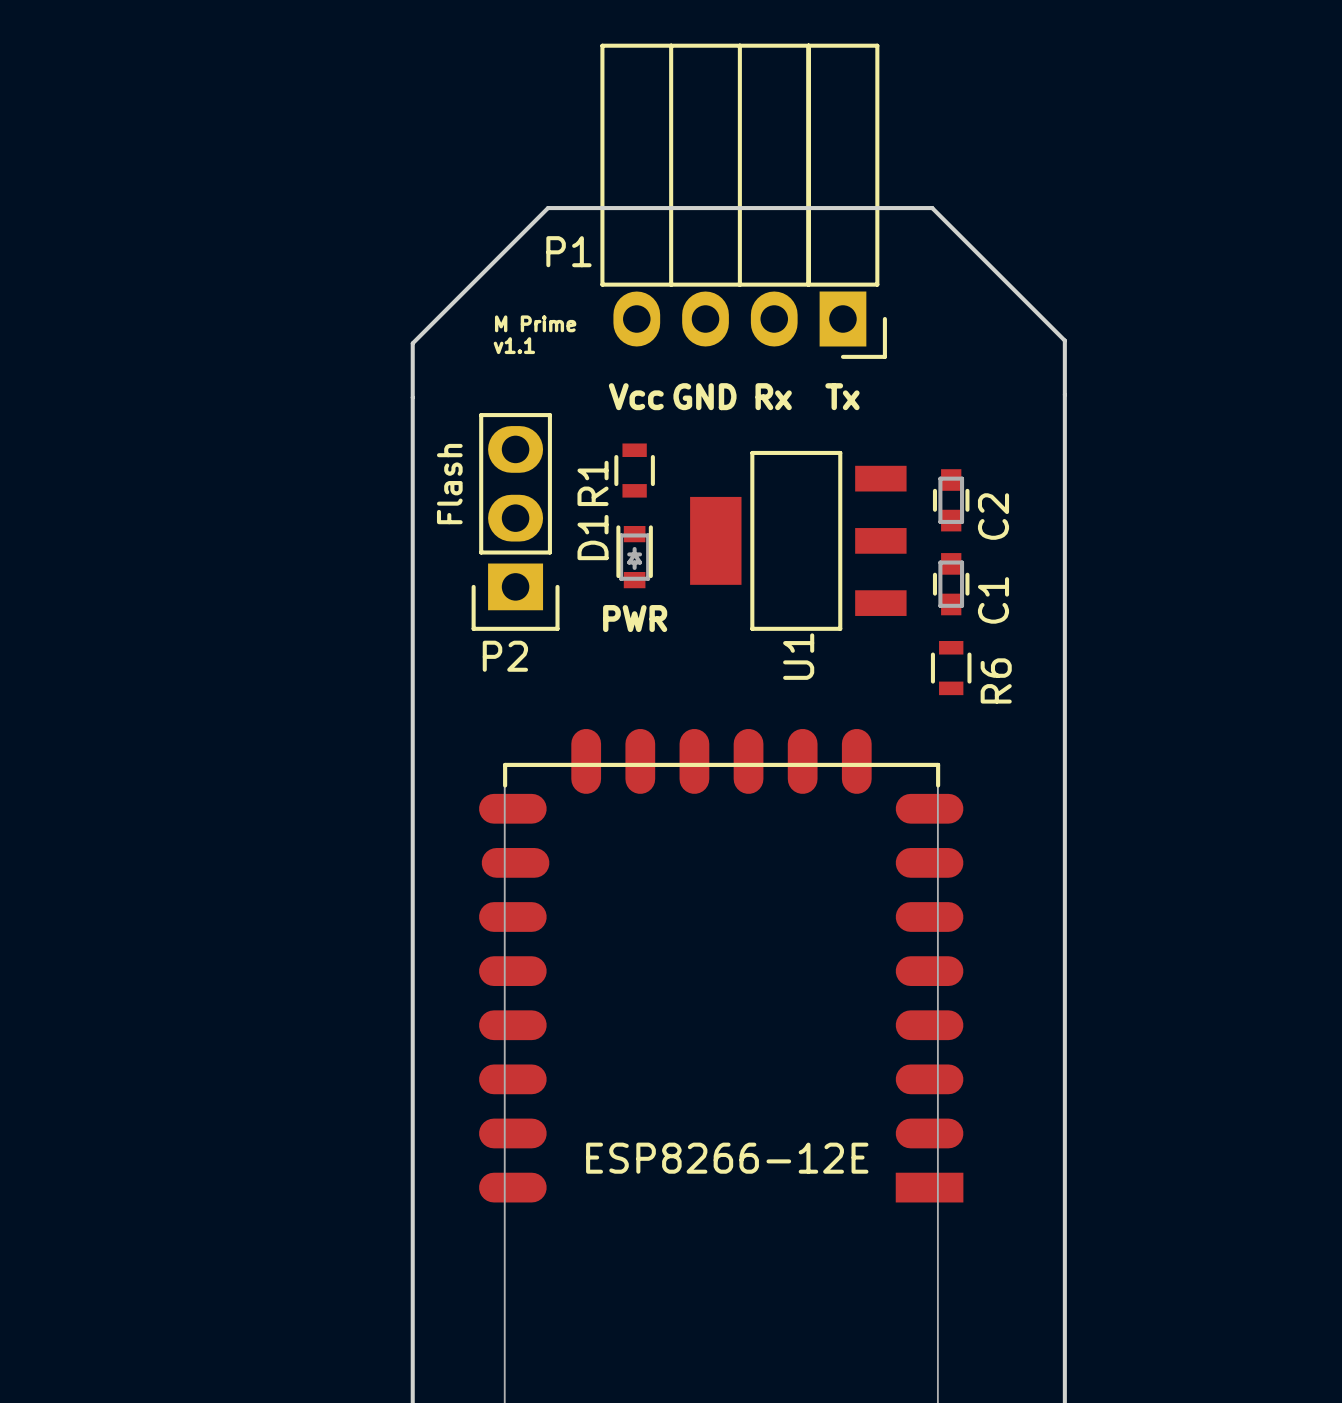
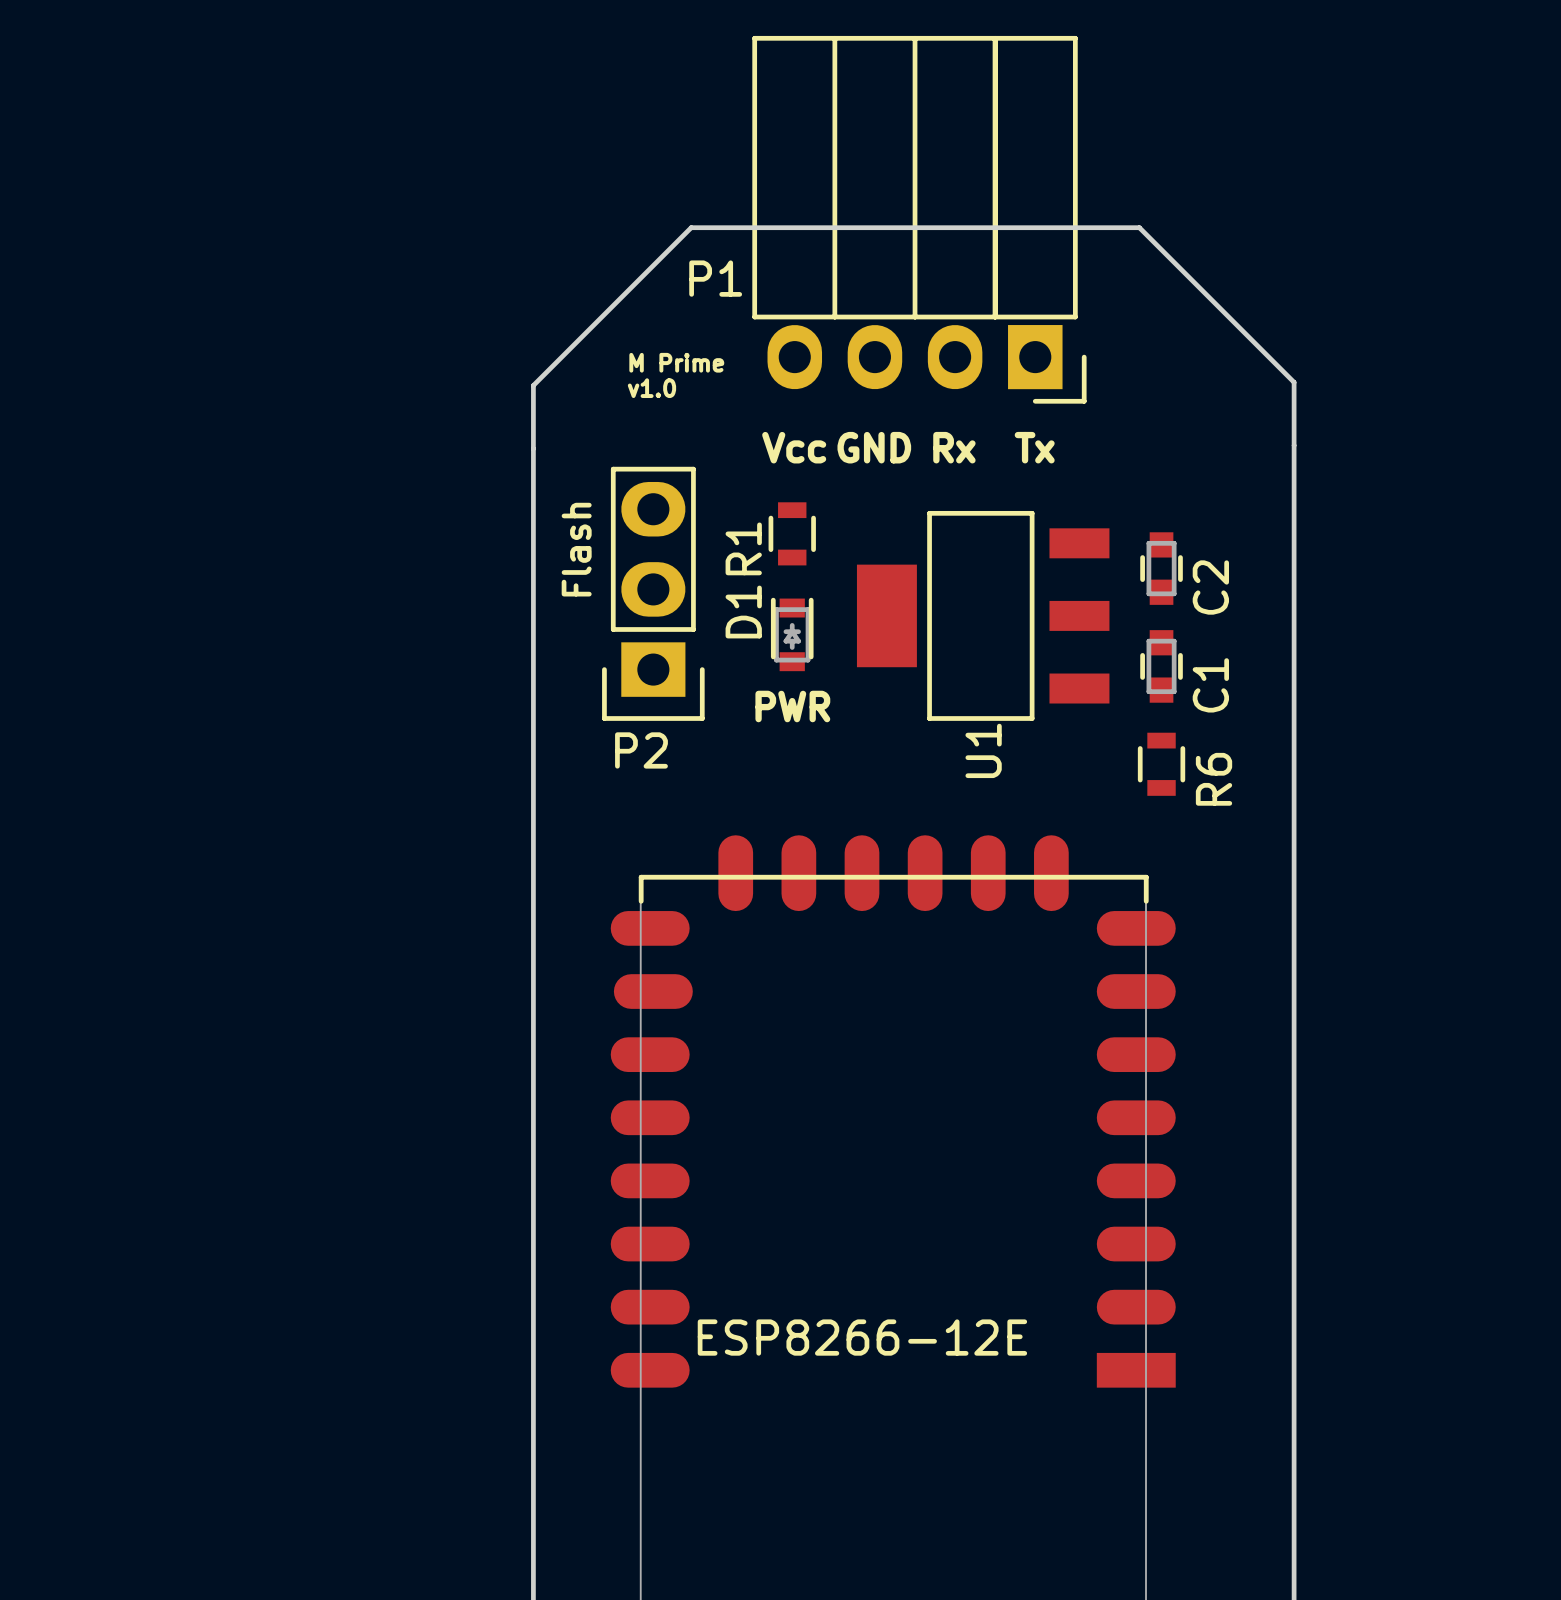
text: v1.1 (514, 345) -> v1.0 (651, 388)
part value position: ESP8266-12E (727, 1158) -> ESP8266-12E (862, 1337)

